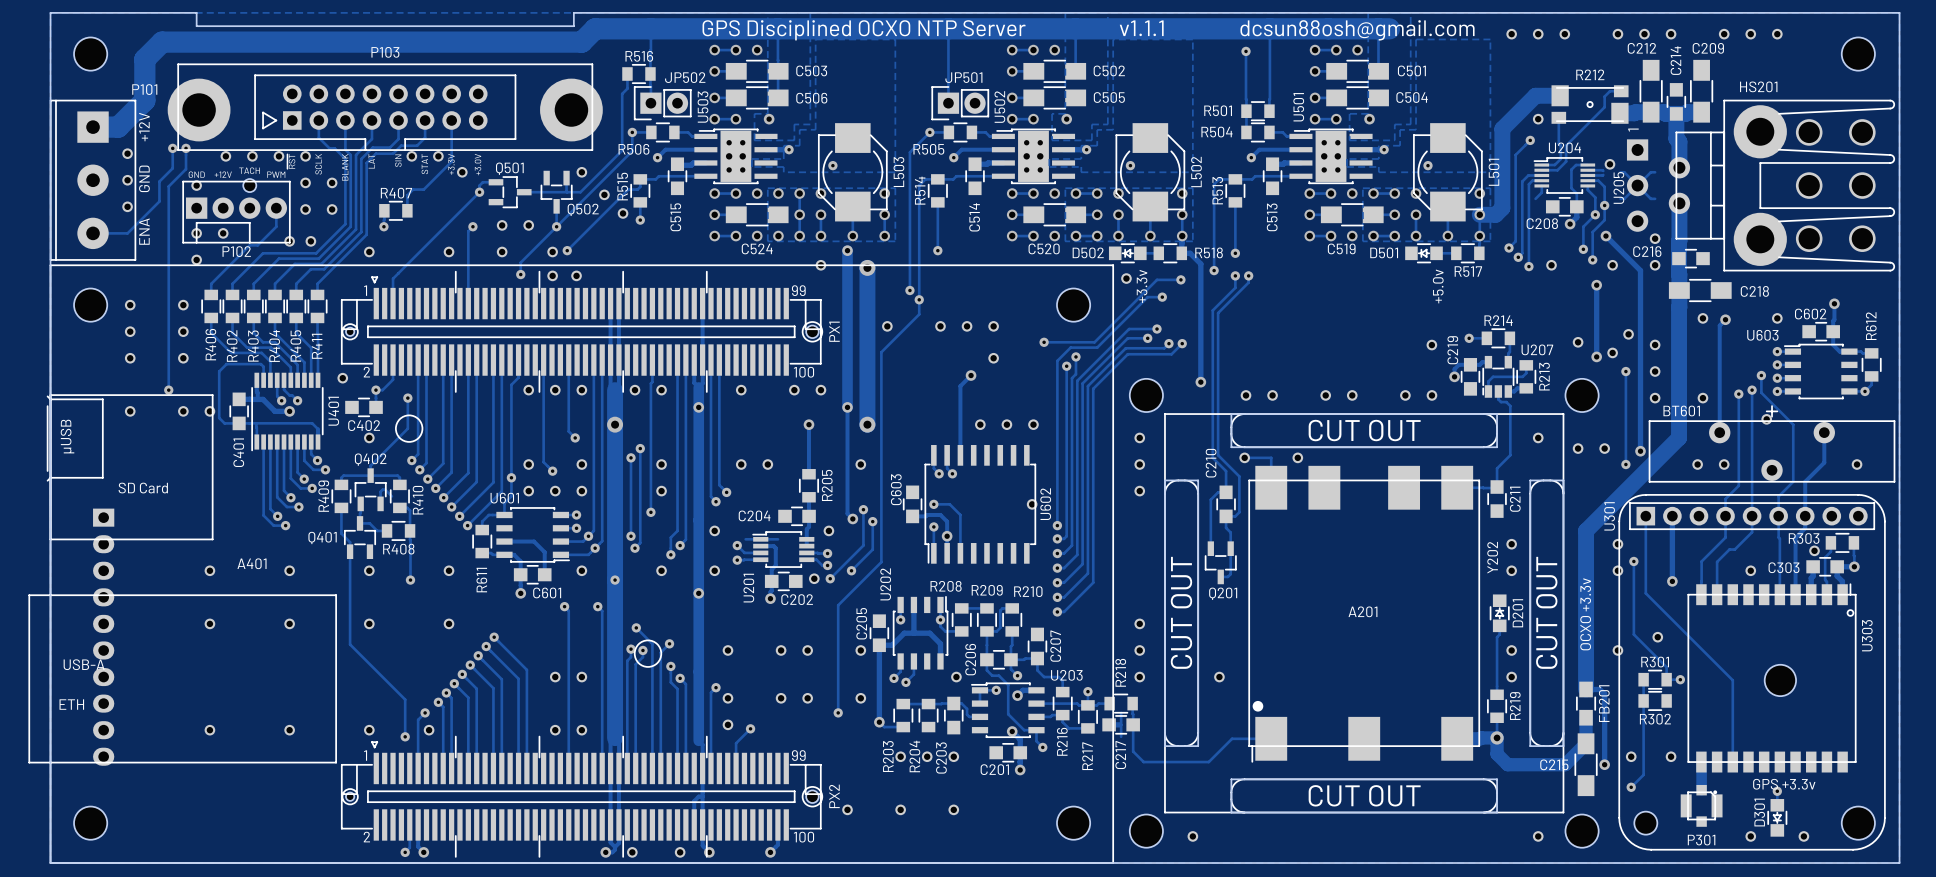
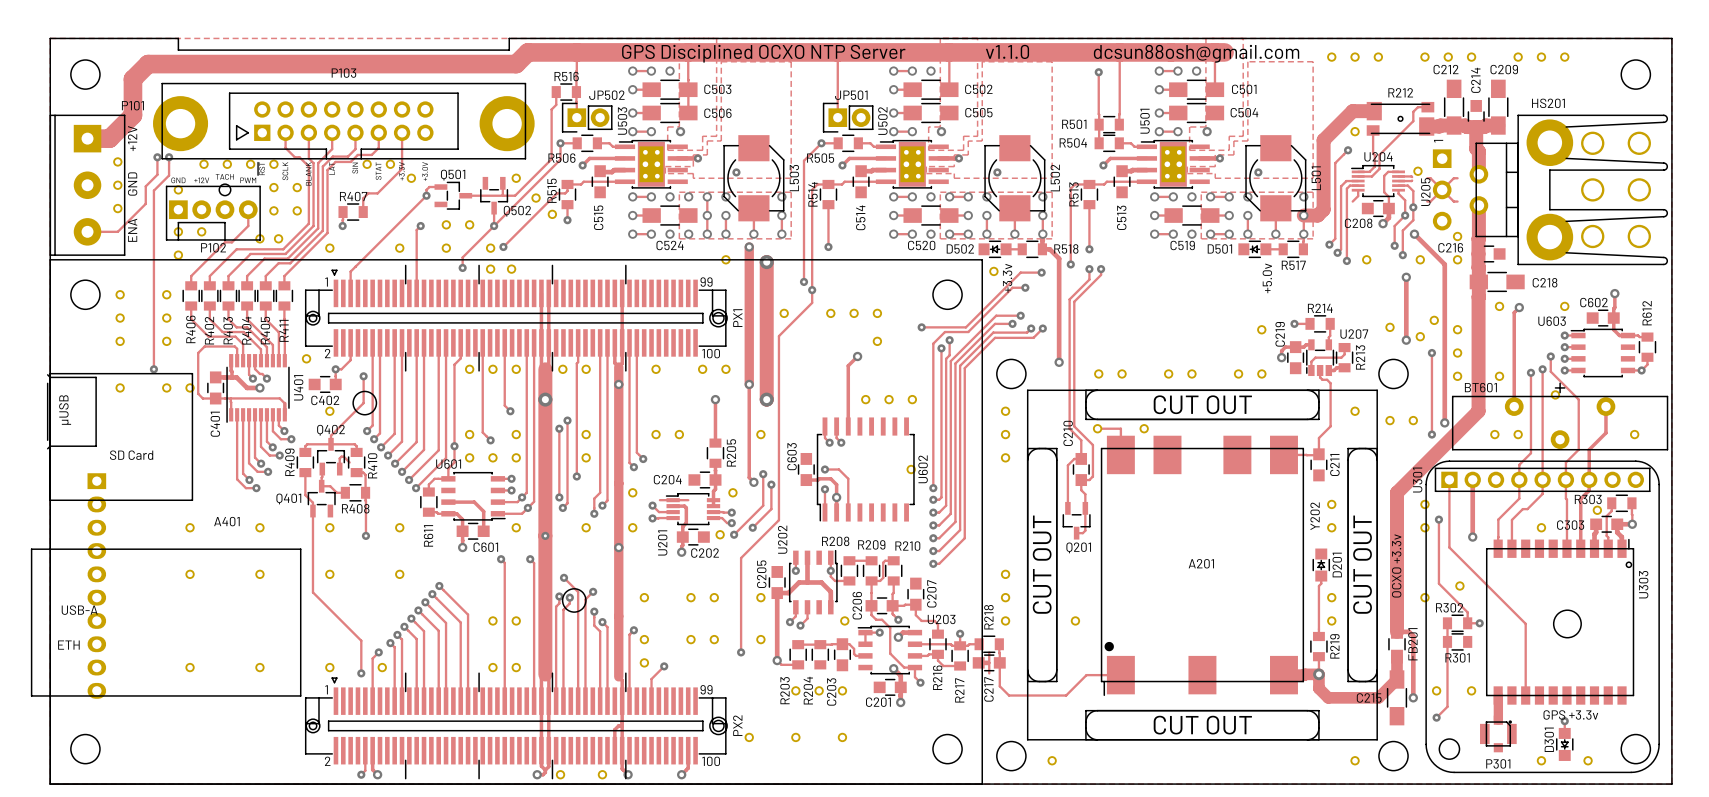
text: v1.1.1 (1141, 28) -> v1.1.0 (1007, 51)
R301 name position: R301 (1655, 662) -> R301 (1457, 657)
R302 name position: R302 (1655, 719) -> R302 (1449, 607)

